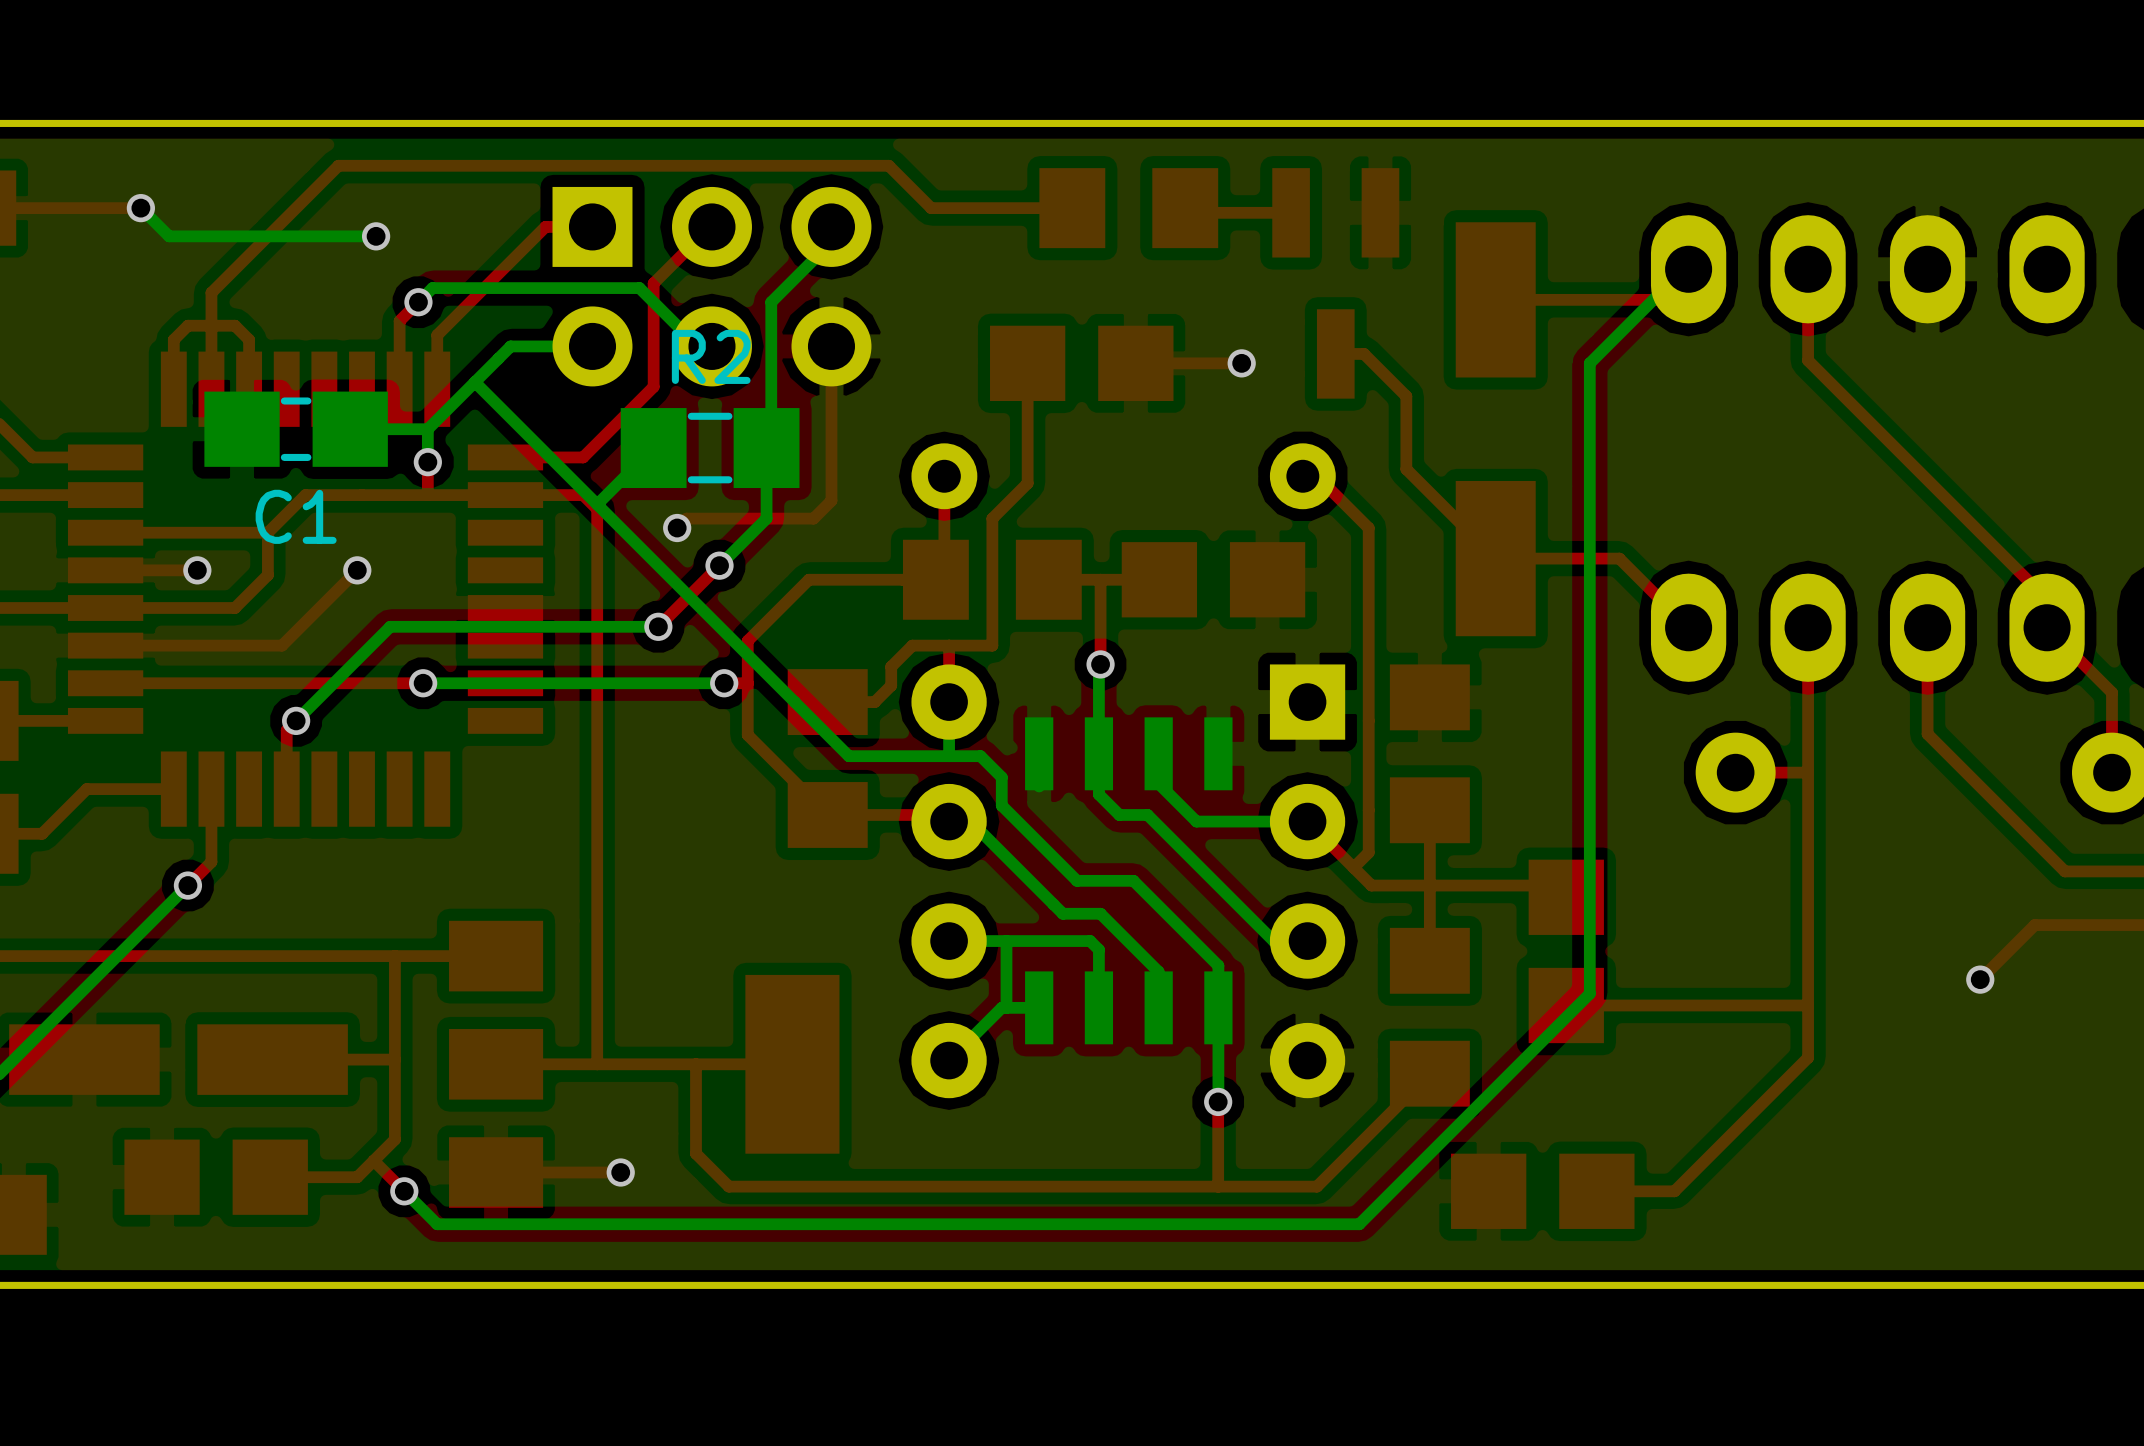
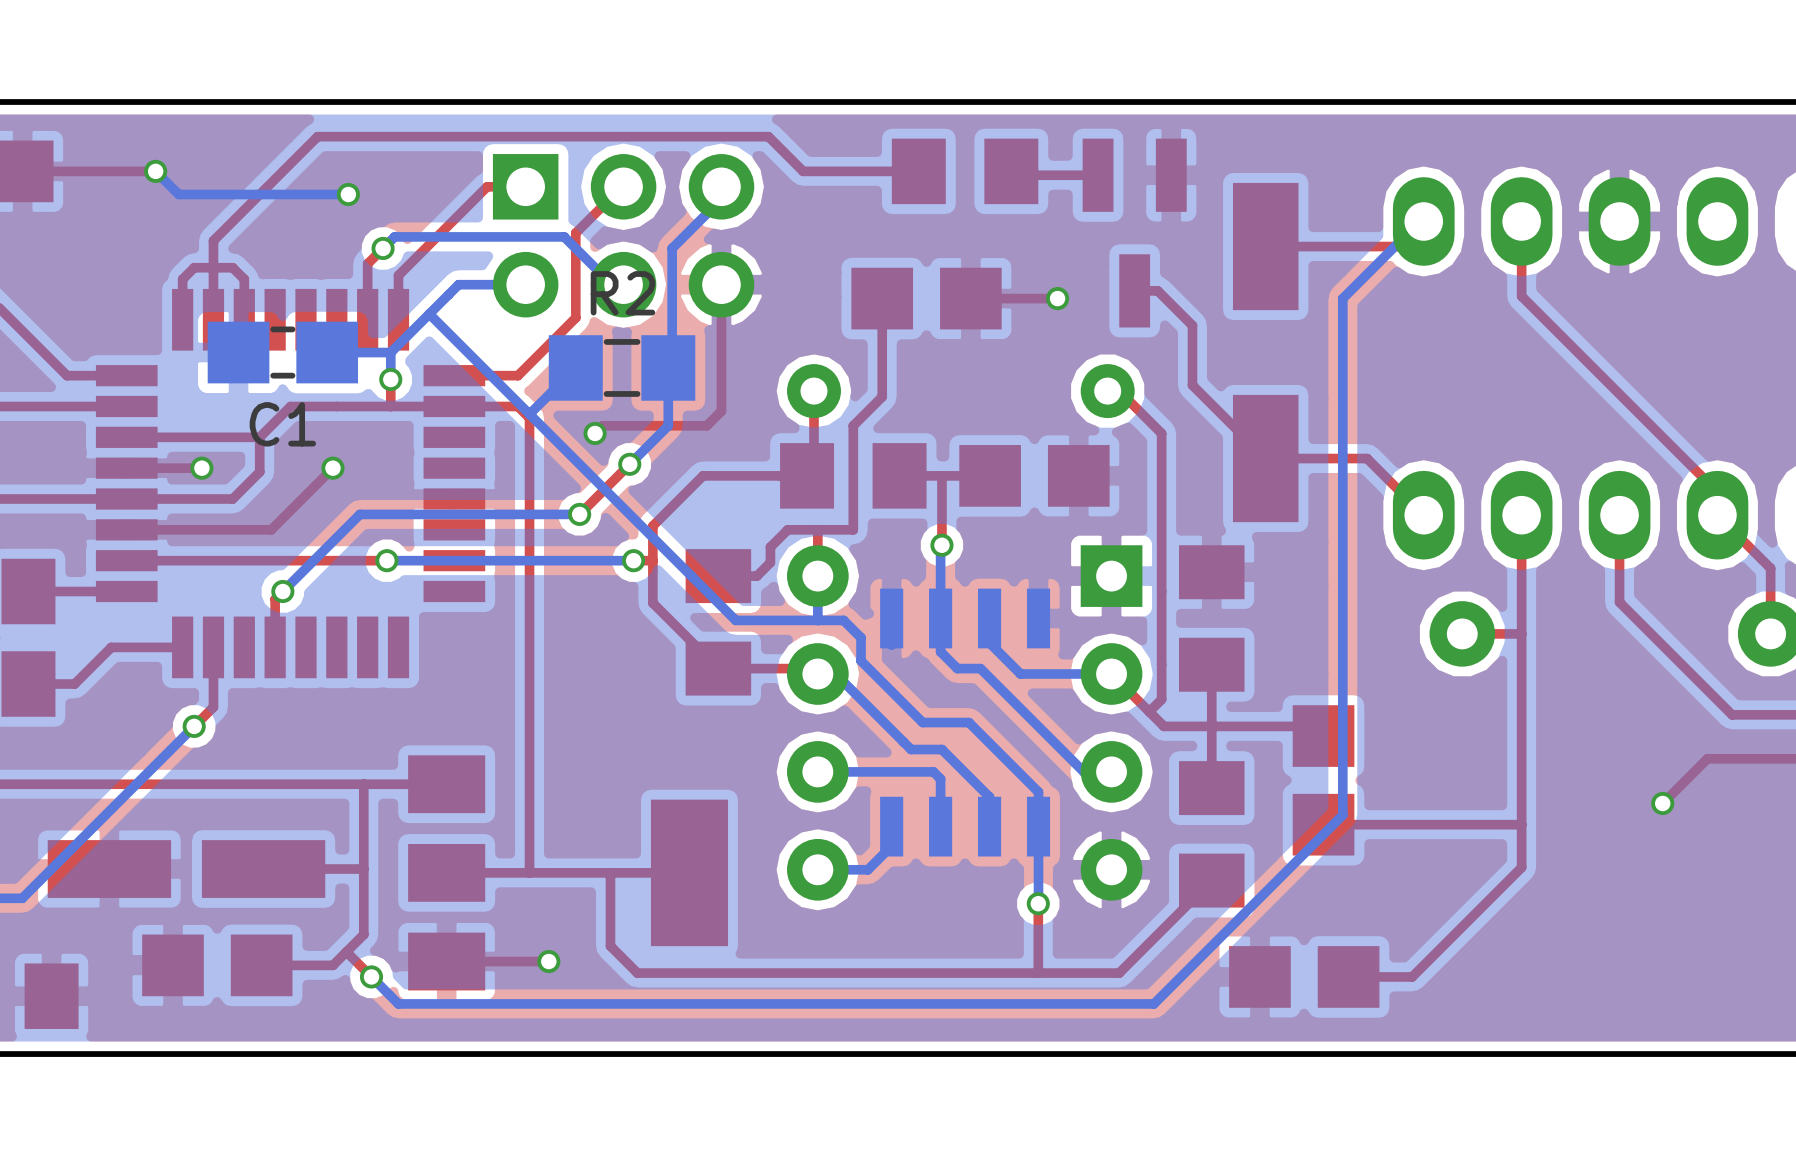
bottom track: (1006, 941) (1006, 1007) -> none
bottom track: (1039, 1007) (1001, 1007) (949, 1060) -> (891, 846) (867, 869) (817, 869)

